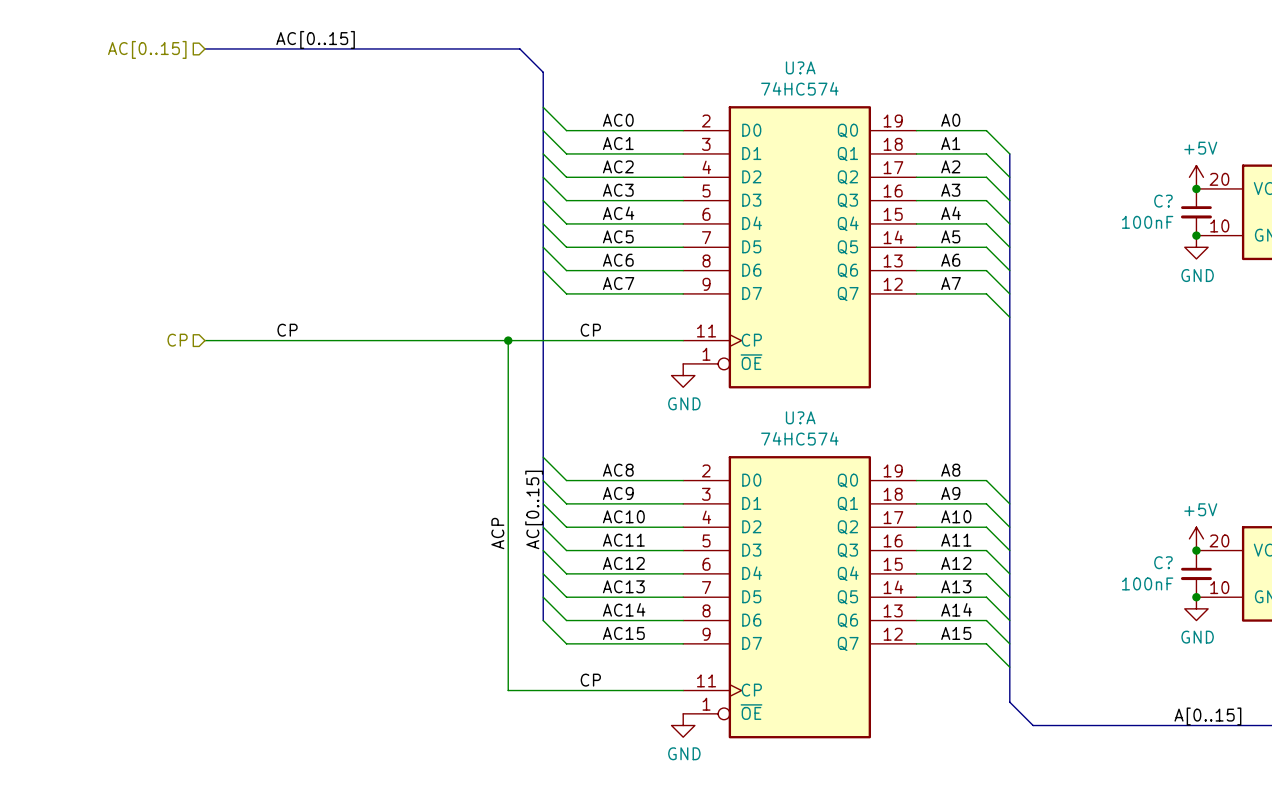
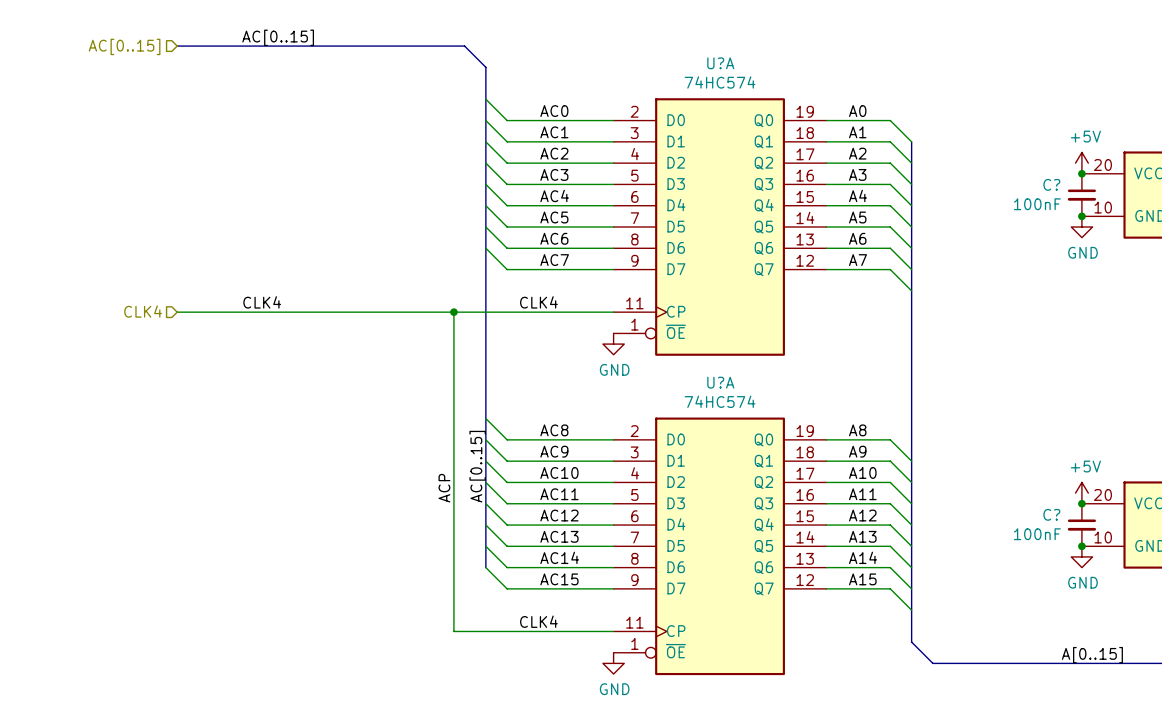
label: CP (287, 330) -> CLK4 (262, 302)
label: CP (590, 330) -> CLK4 (538, 302)
hierarchical label: CP (177, 340) -> CLK4 (143, 311)
label: CP (590, 680) -> CLK4 (538, 621)

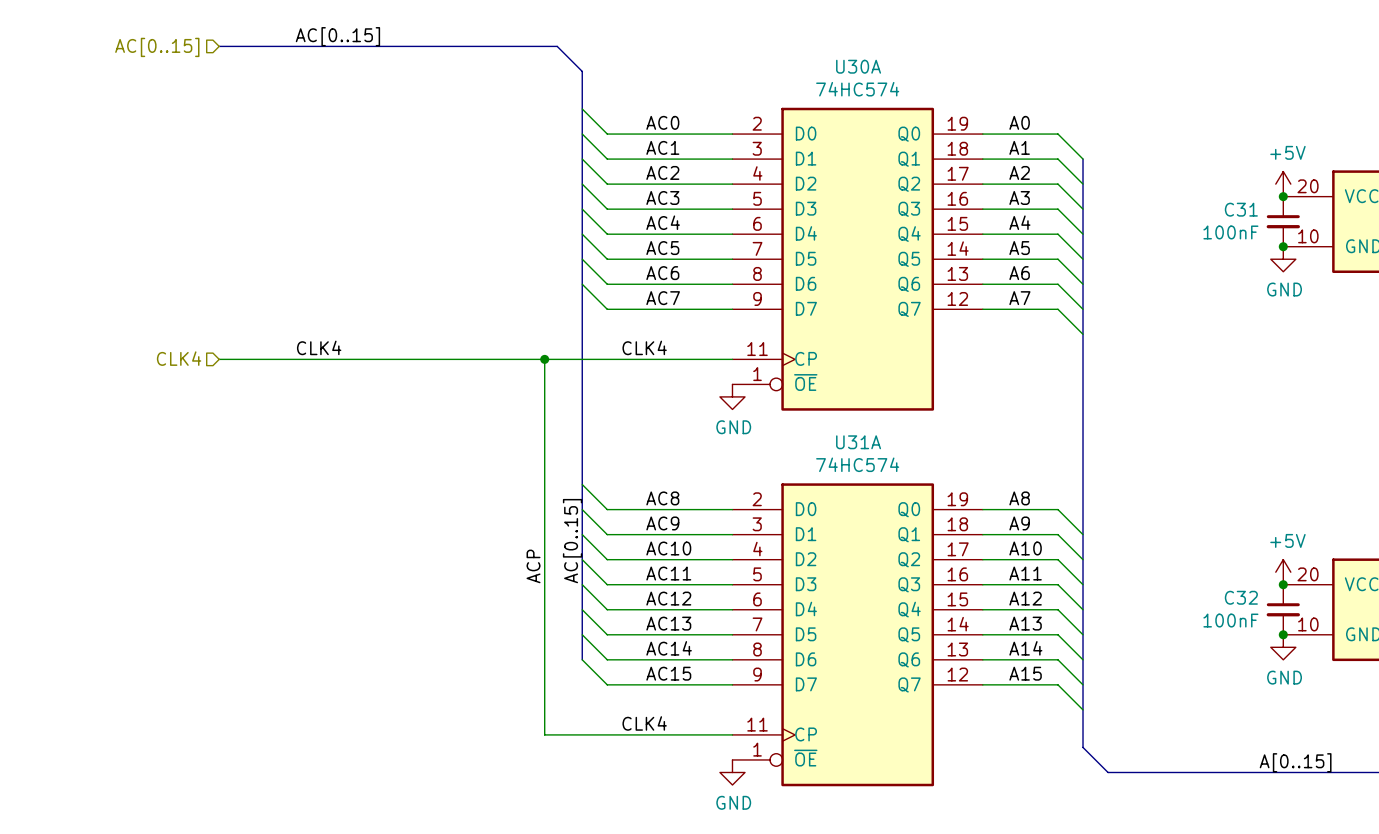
U?A name: U?A (720, 63) -> U30A (858, 66)
C? name: C? (1051, 184) -> C31 (1241, 209)
U?A name: U?A (720, 382) -> U31A (858, 442)
C? name: C? (1051, 514) -> C32 (1241, 597)

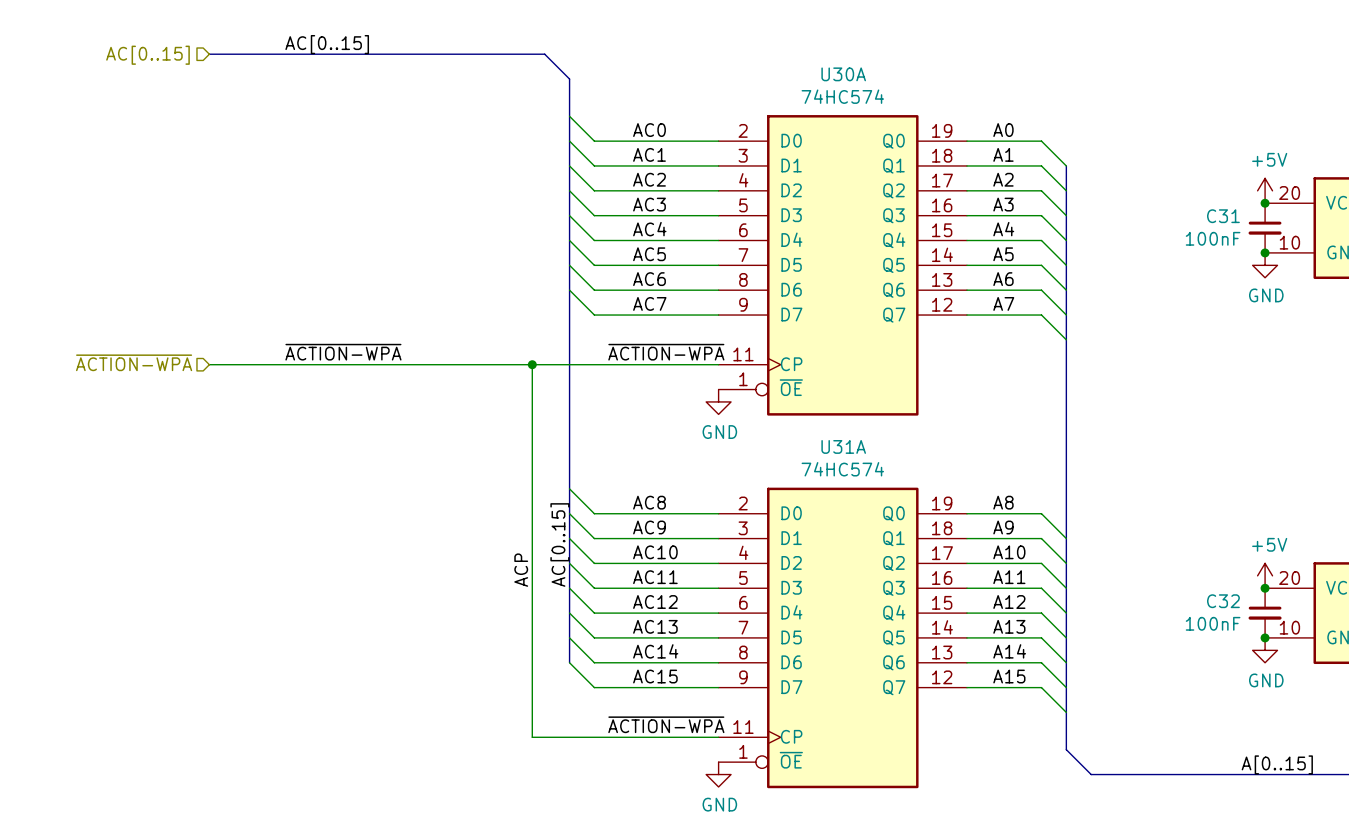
label: CLK4 (319, 347) -> ~{ACTION-WPA} (343, 352)
label: CLK4 (644, 347) -> ~{ACTION-WPA} (666, 352)
hierarchical label: CLK4 (179, 358) -> ~{ACTION-WPA} (134, 362)
label: CLK4 (644, 723) -> ~{ACTION-WPA} (666, 724)

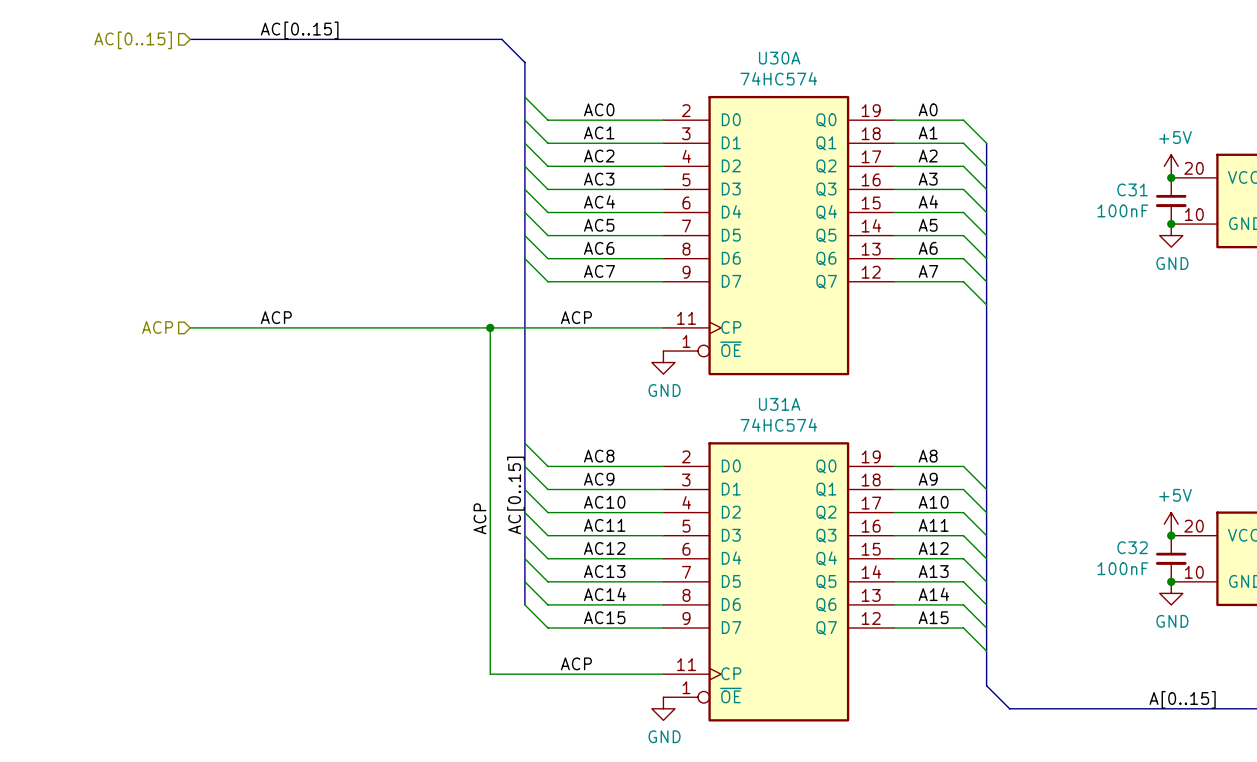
label: ~{ACTION-WPA} (343, 352) -> ACP (276, 317)
label: ~{ACTION-WPA} (666, 352) -> ACP (576, 317)
hierarchical label: ~{ACTION-WPA} (134, 362) -> ACP (157, 327)
label: ~{ACTION-WPA} (666, 724) -> ACP (576, 663)

